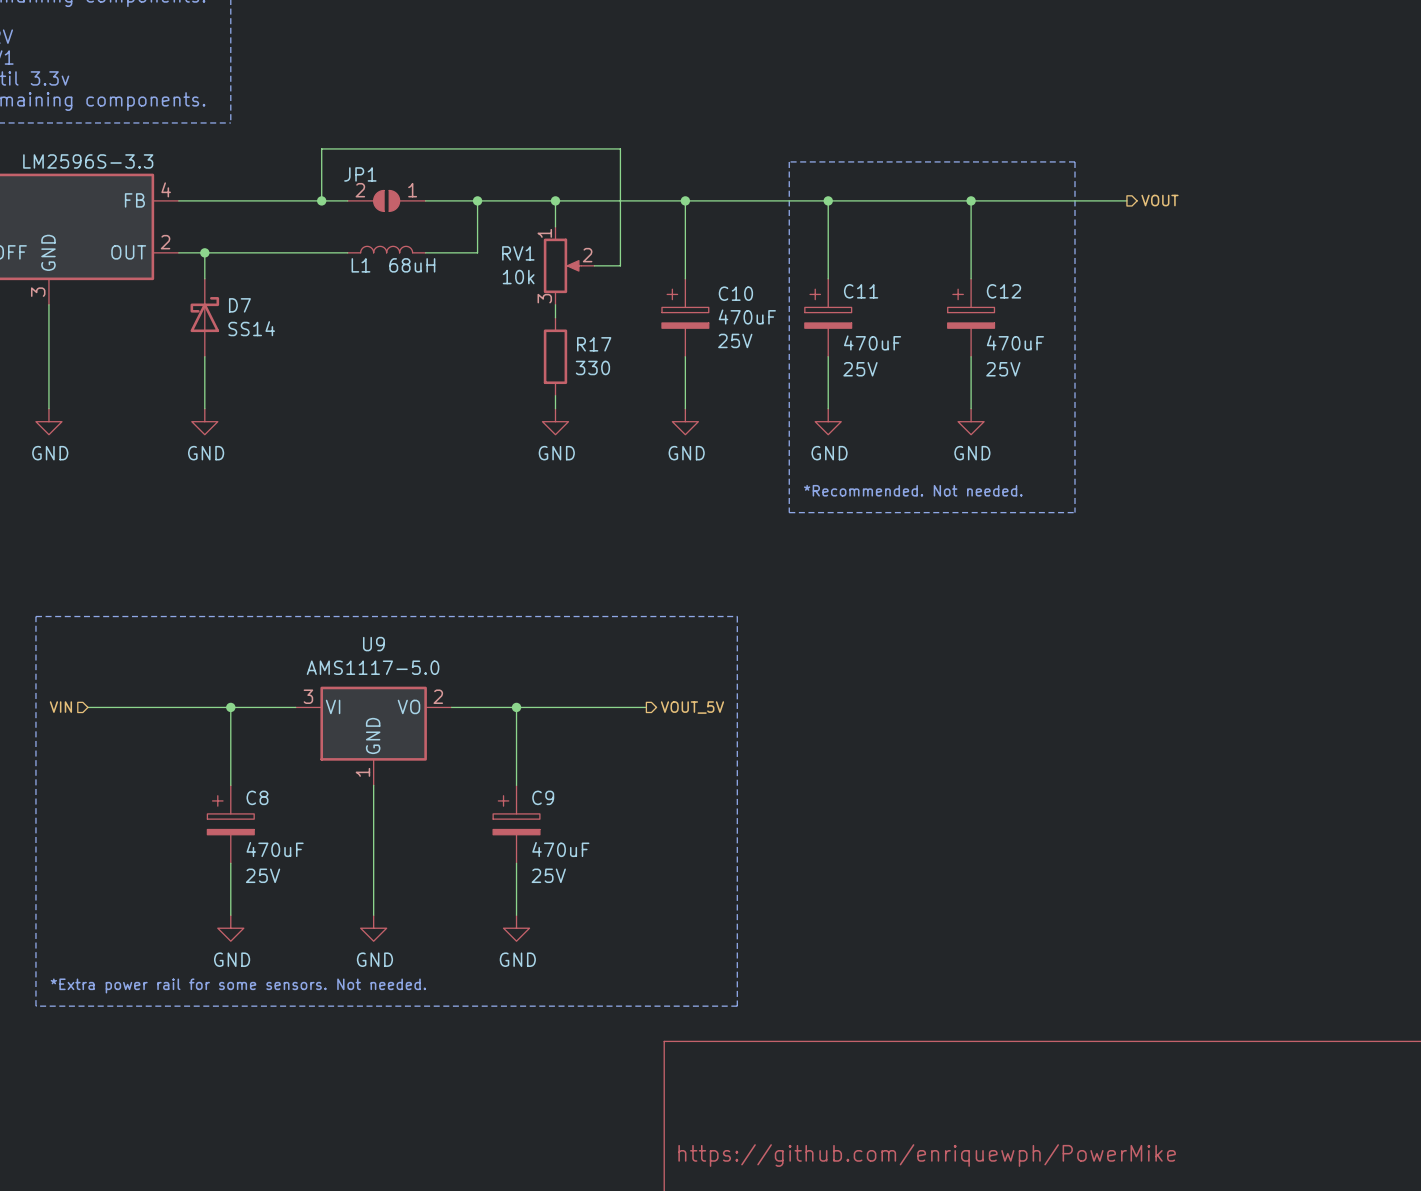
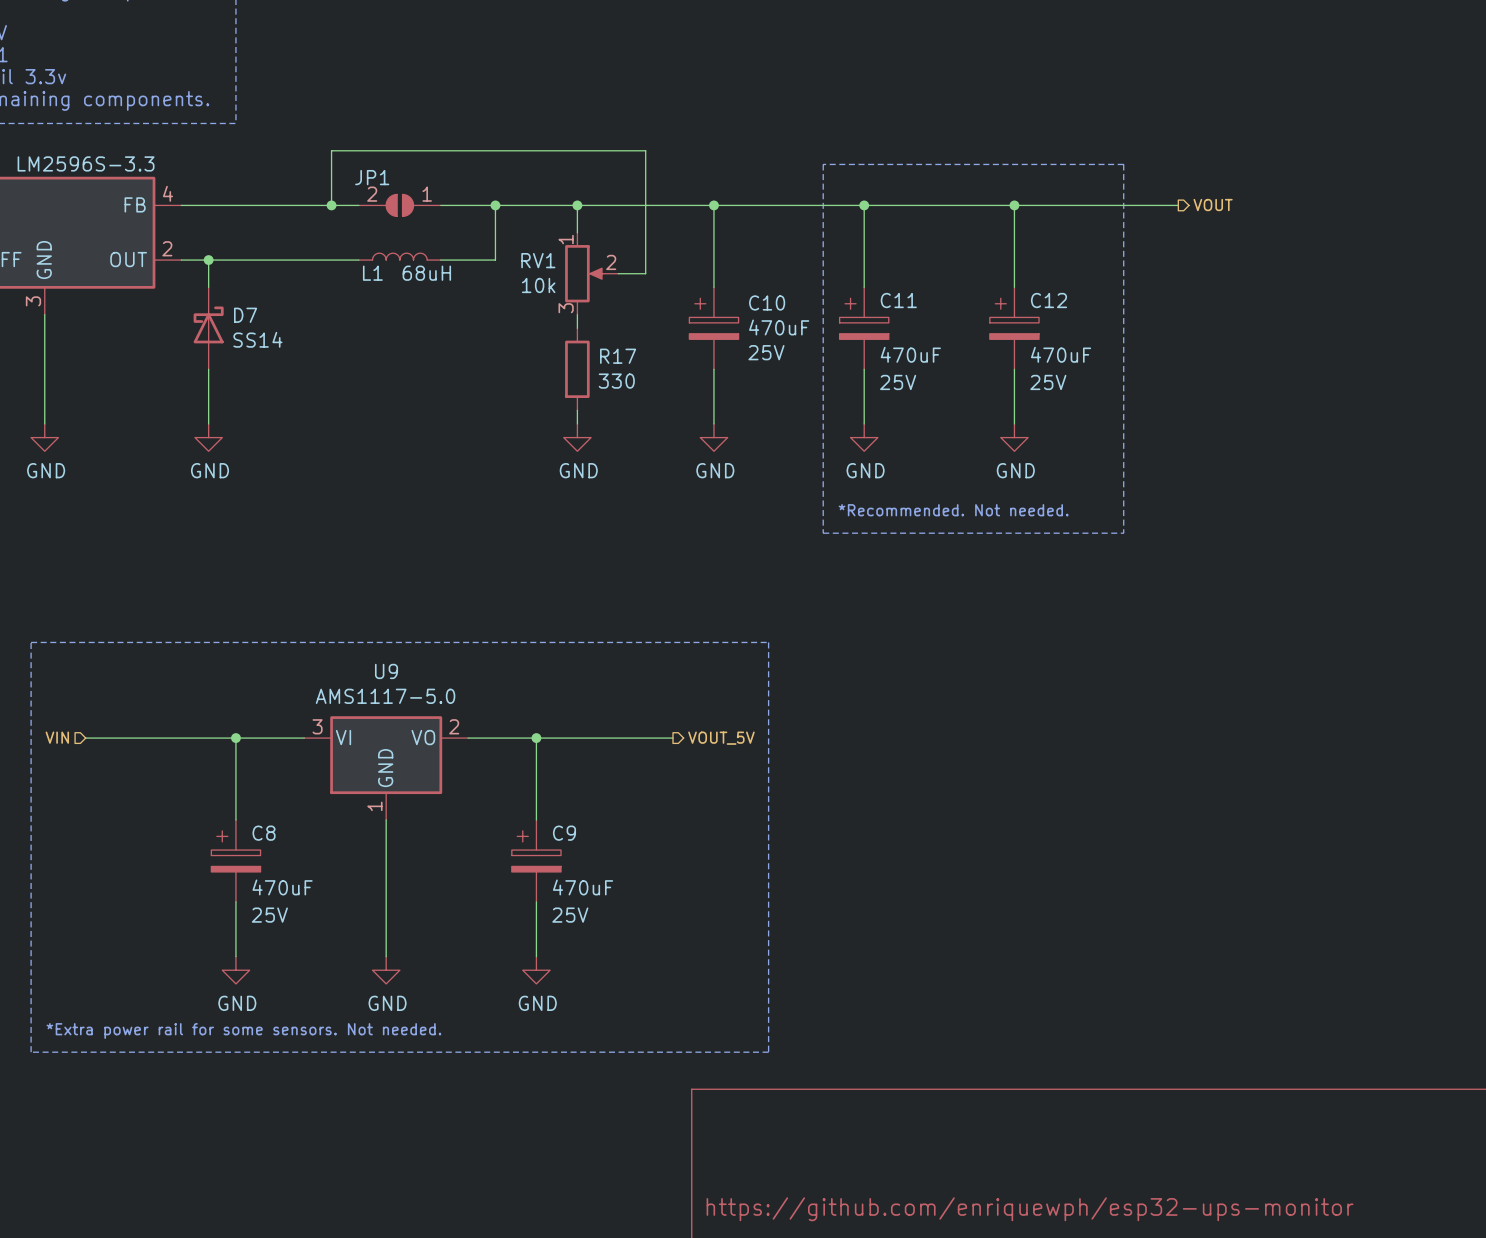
title block: https://github.com/enriquewph/PowerMike (927, 1155) -> https://github.com/enriquewph/esp32-ups-monitor (1030, 1209)

